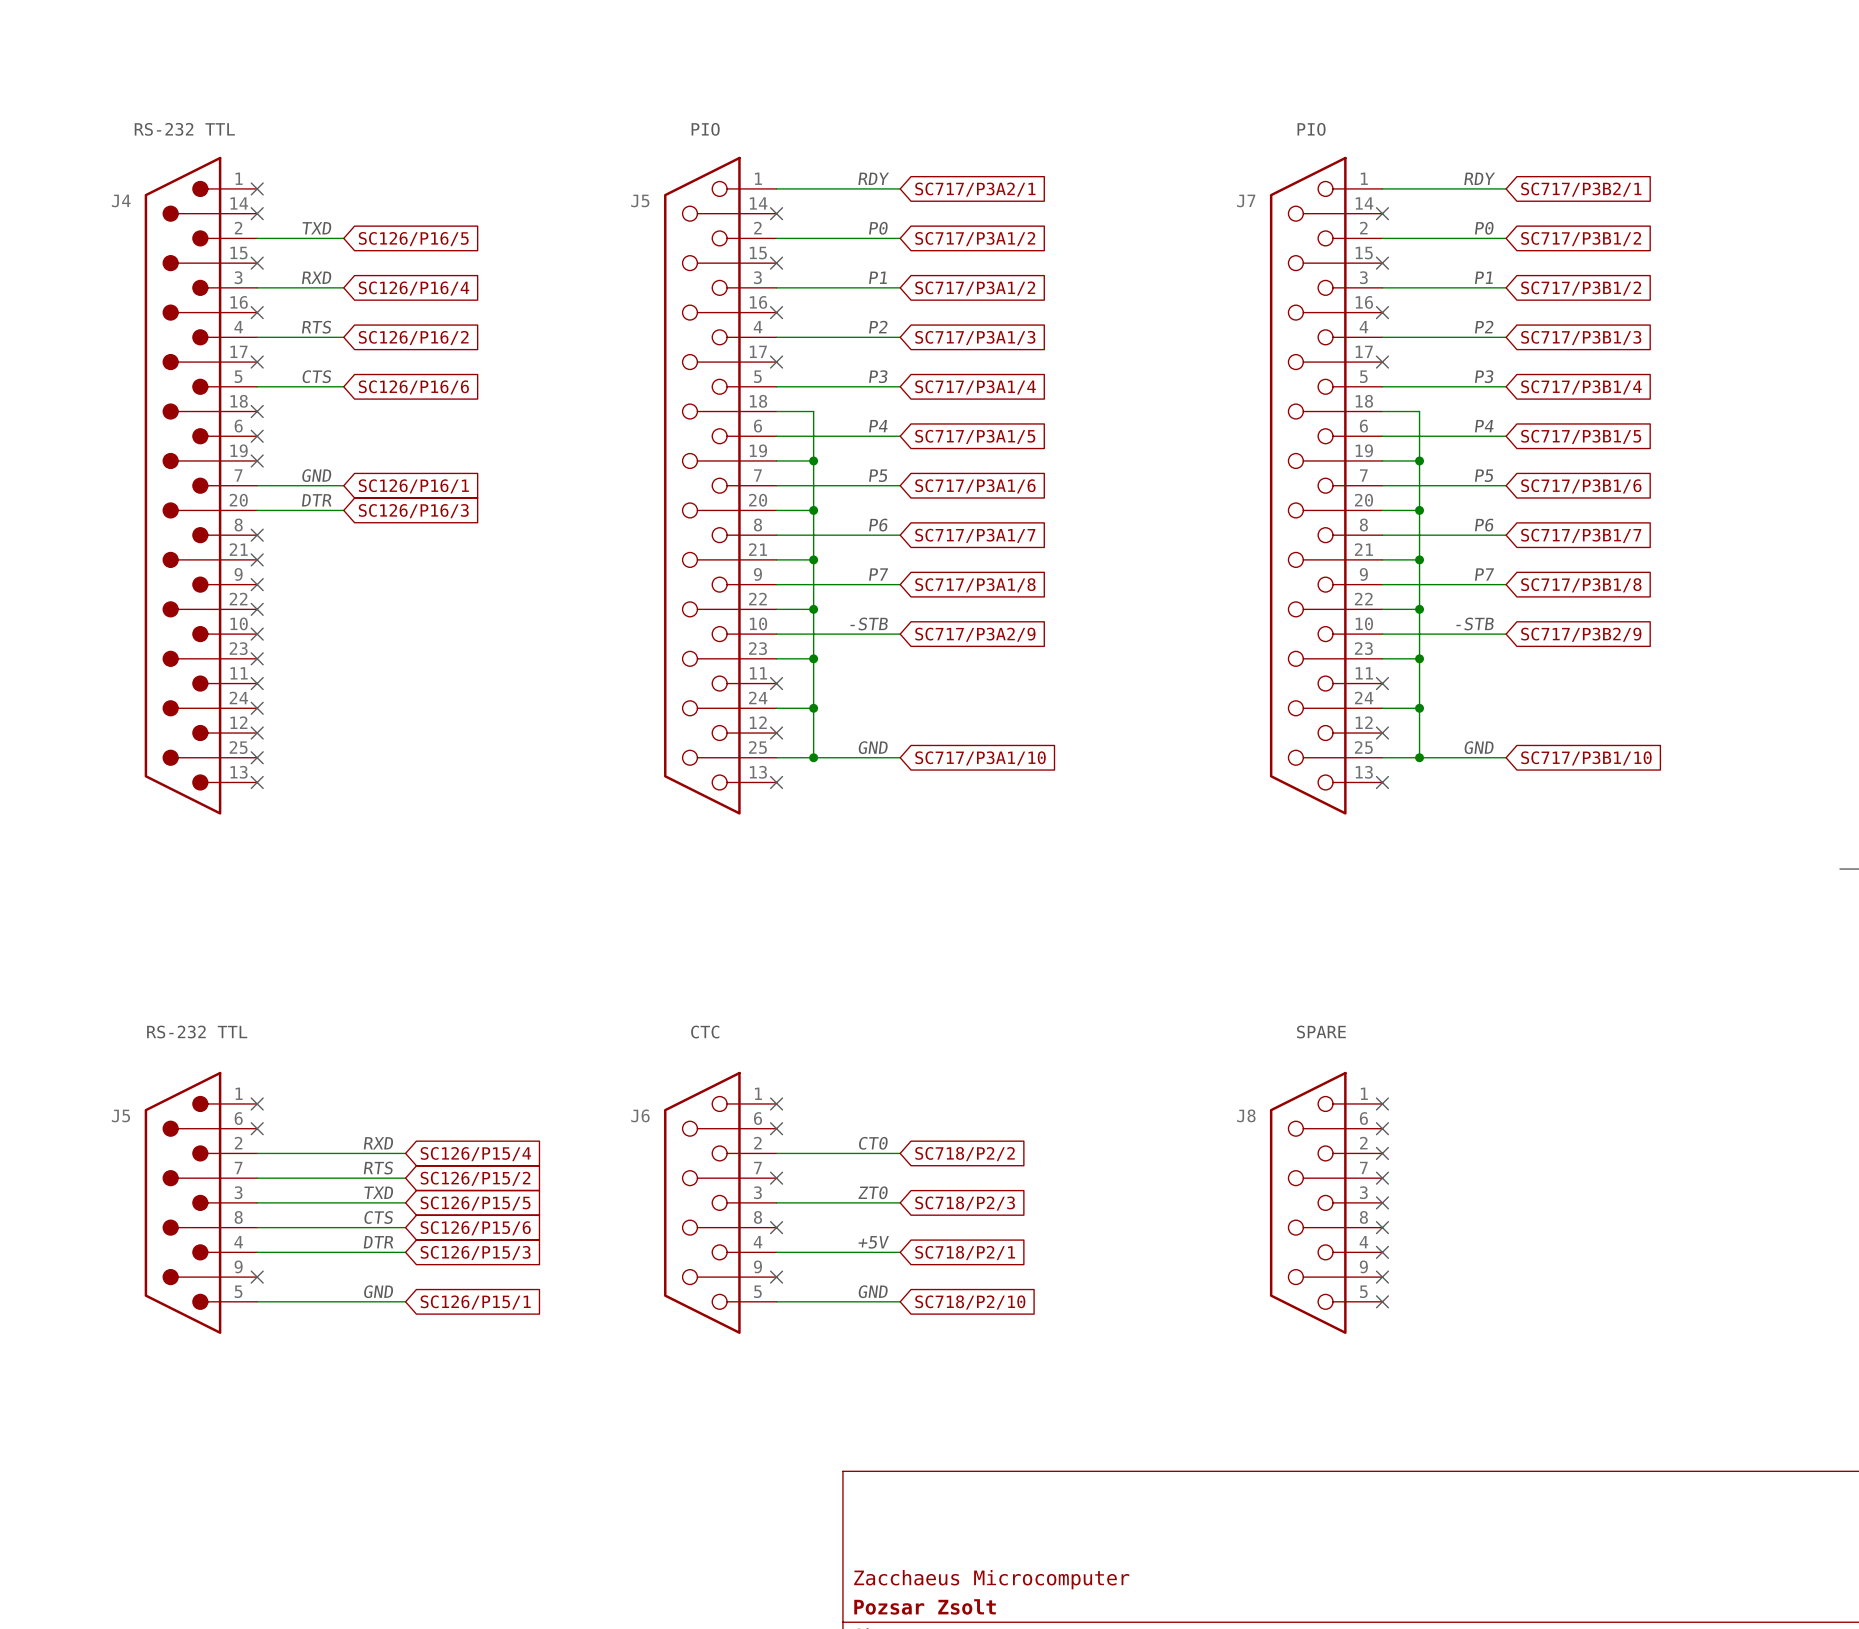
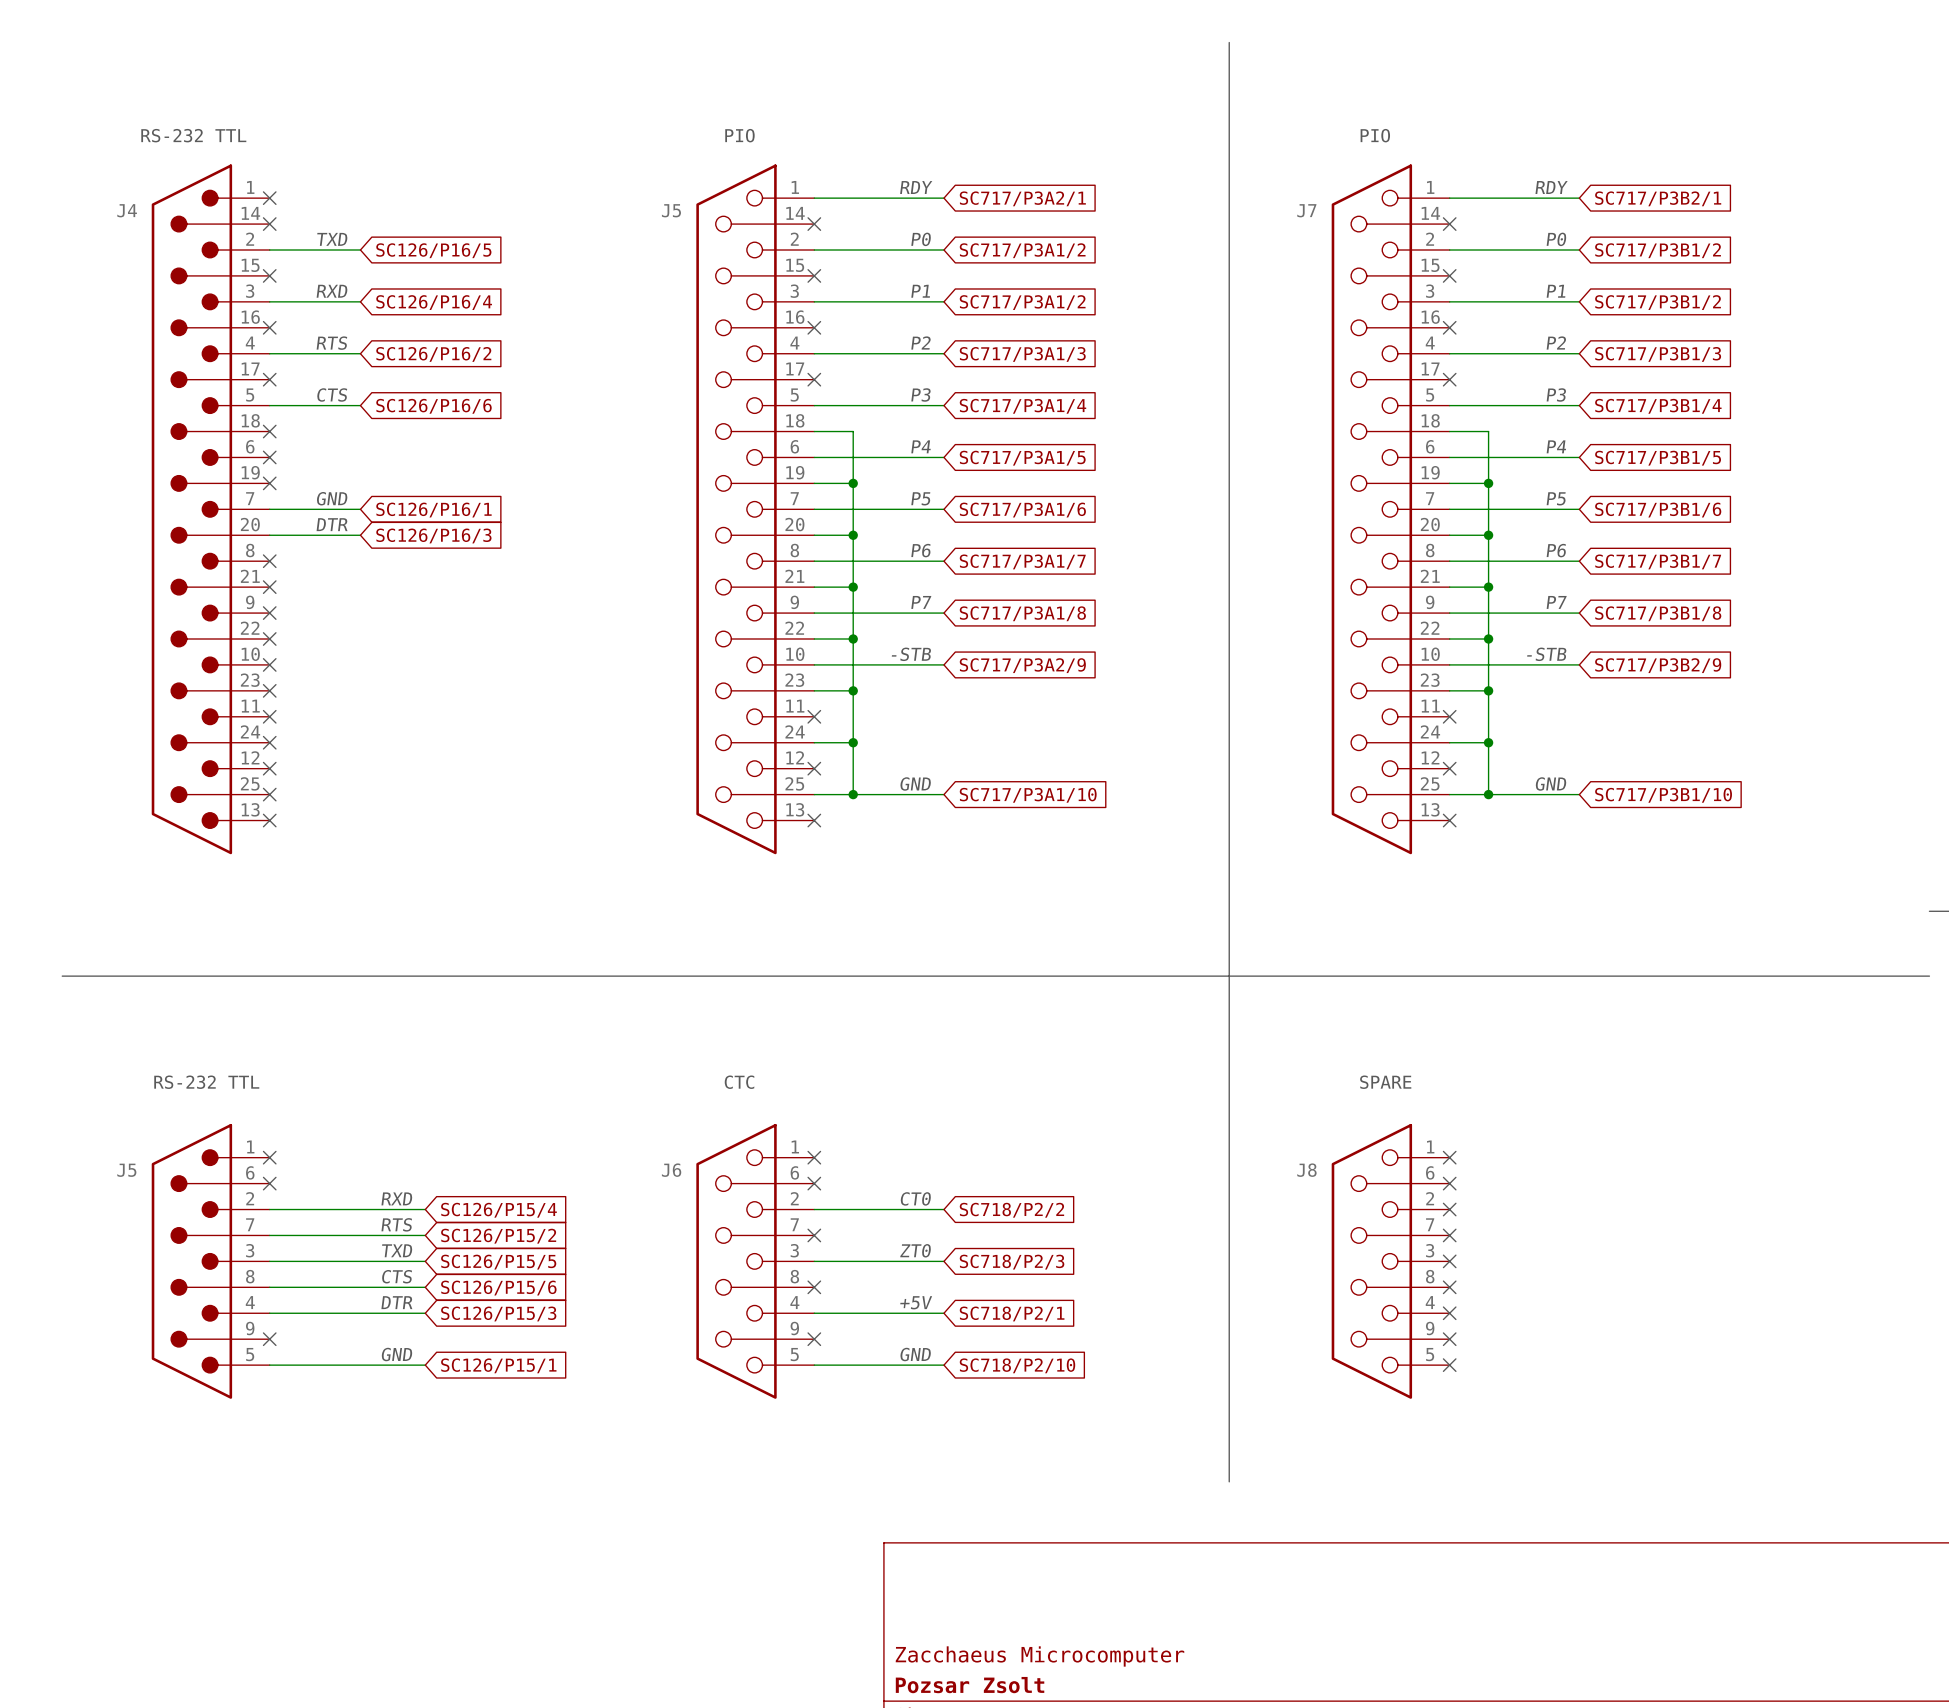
line: none -> (1229, 42) (1229, 1481)
line: none -> (62, 976) (1929, 976)

